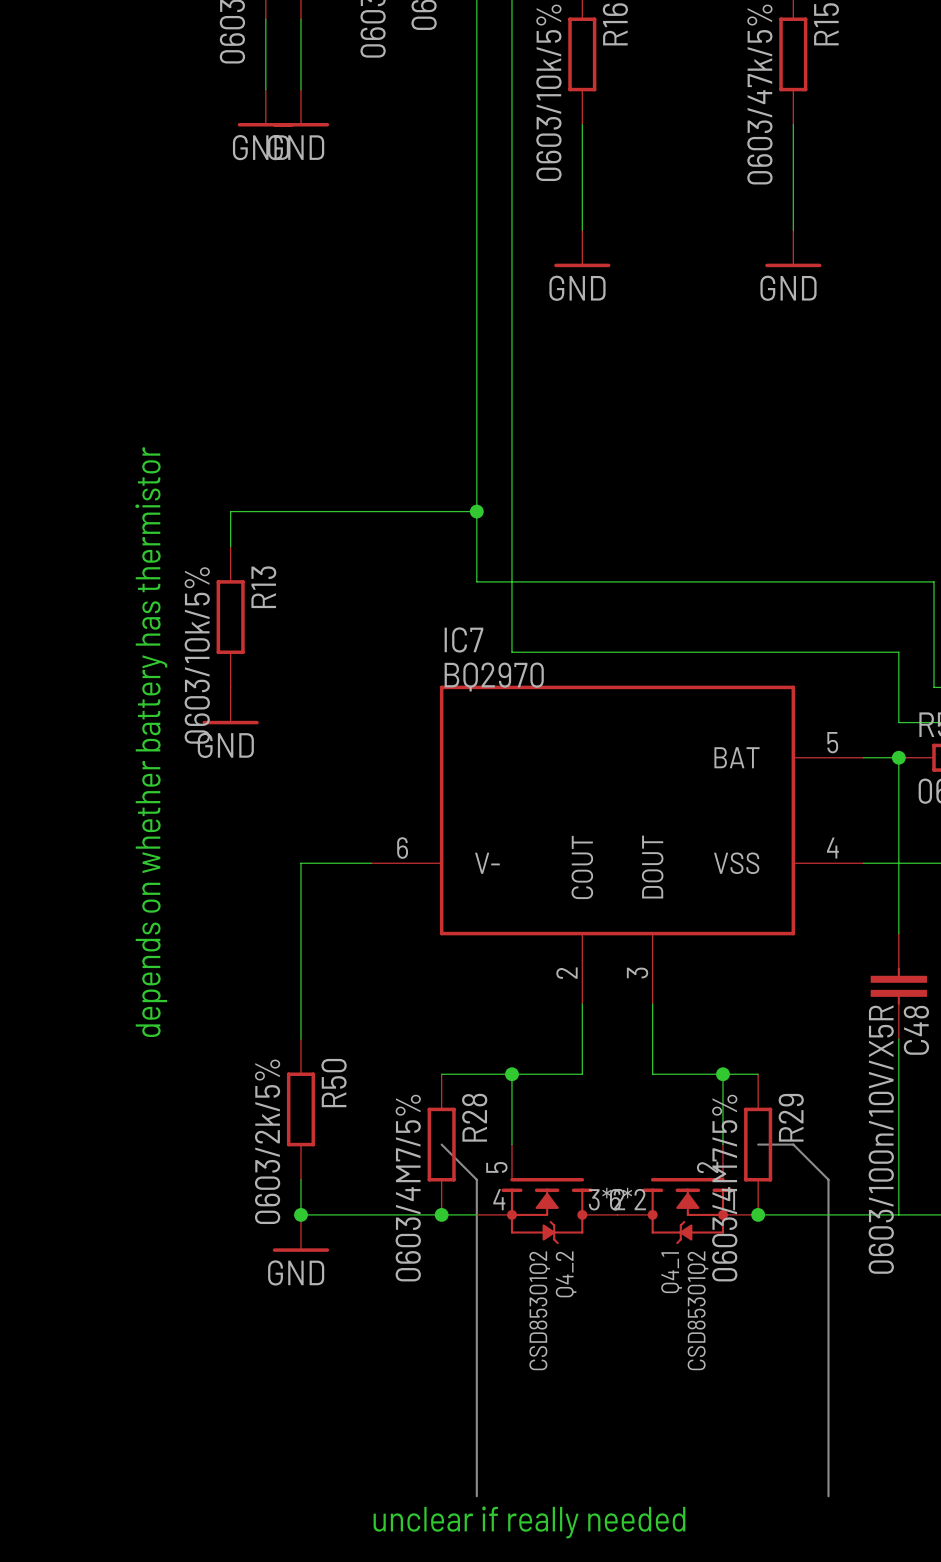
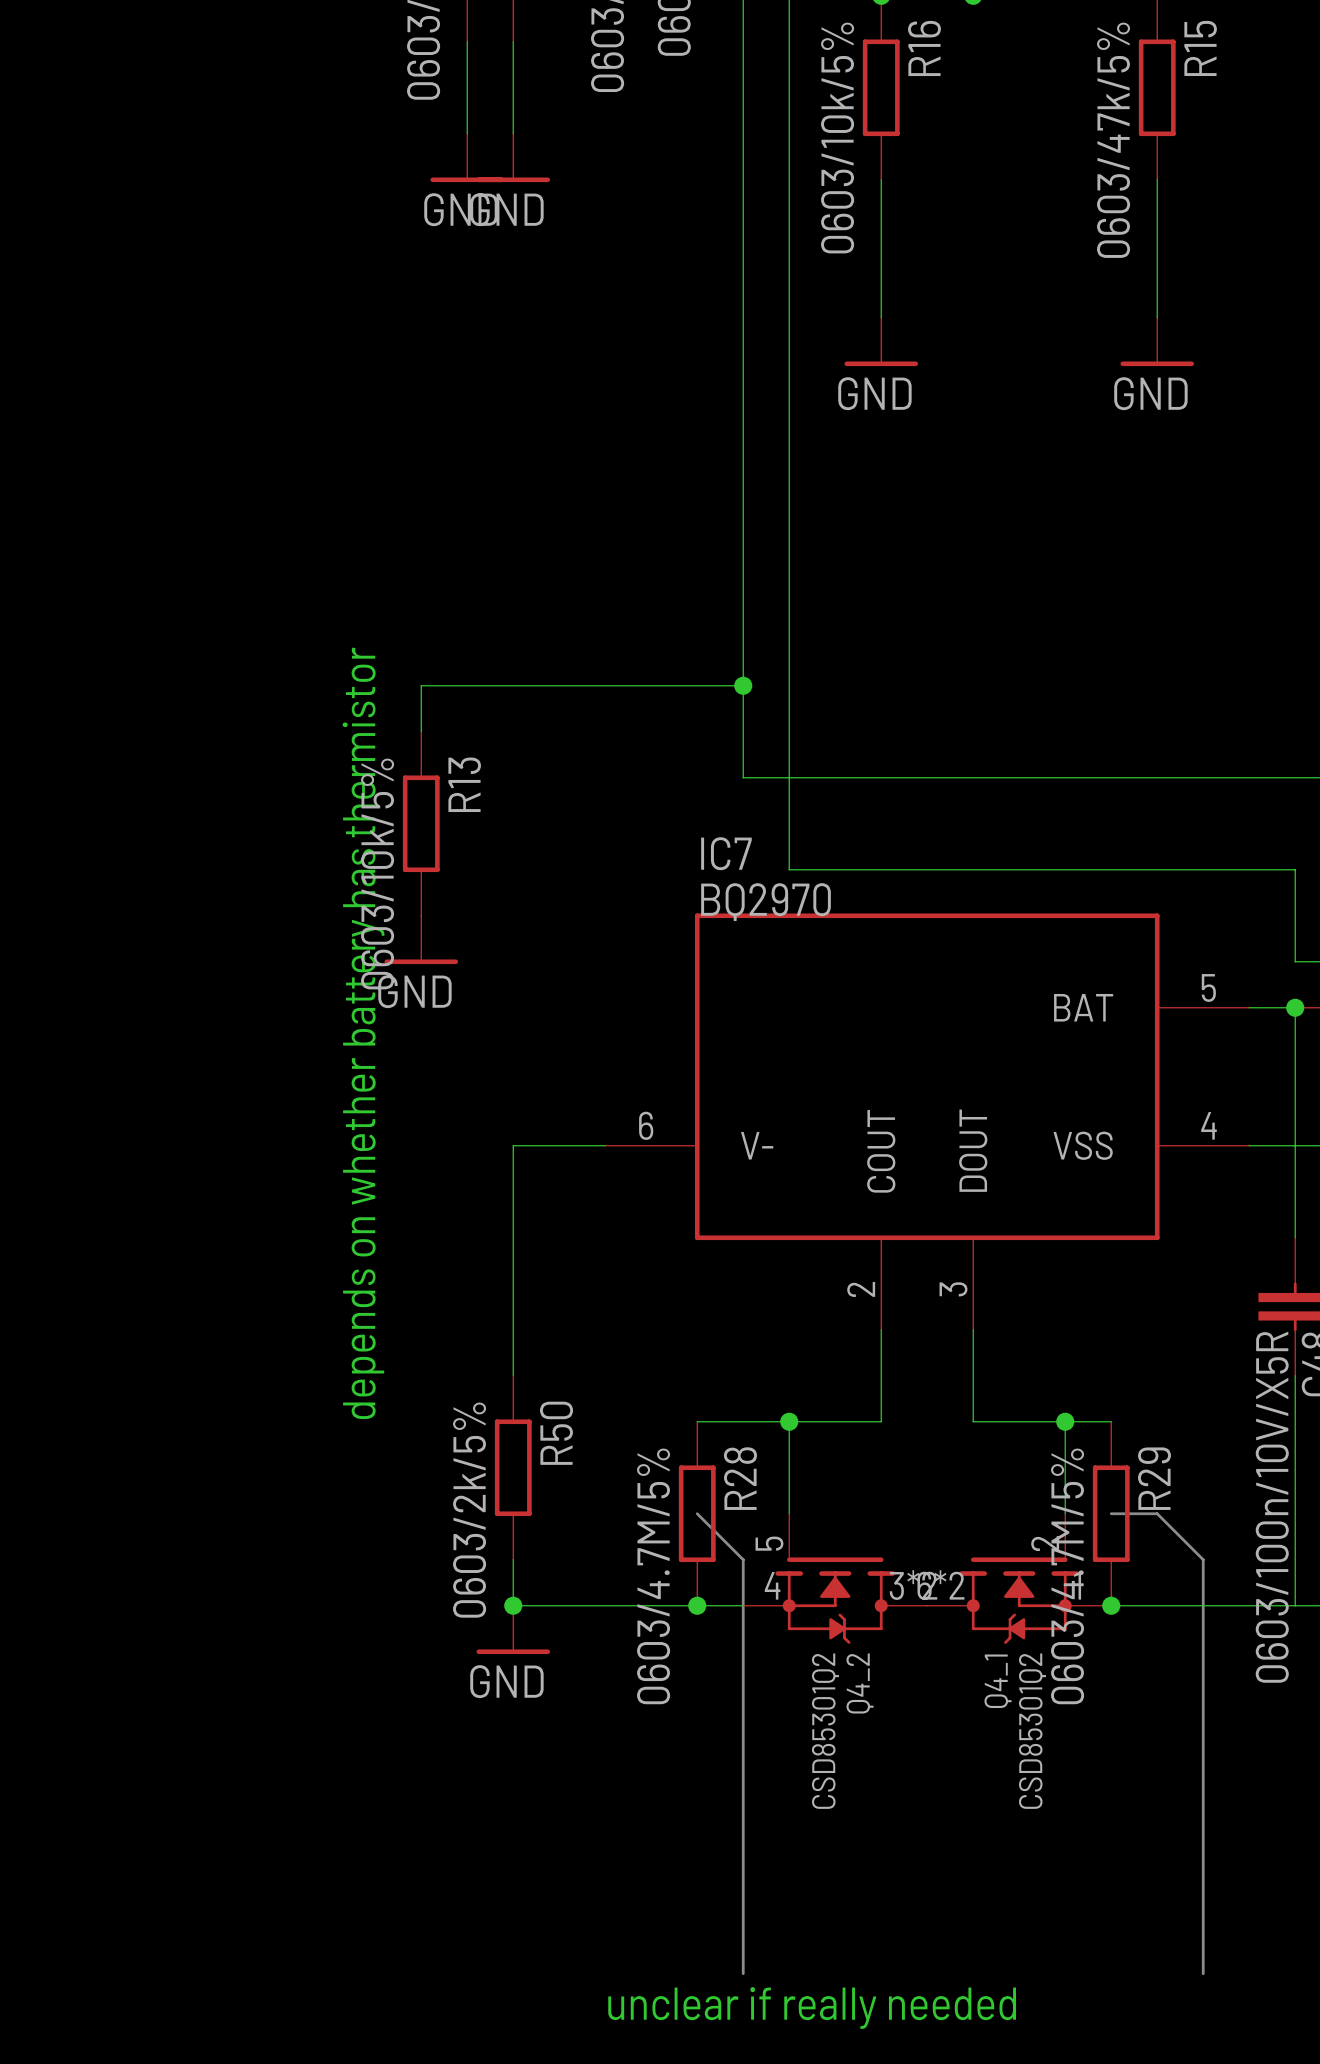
text position: depends on whether battery has thermistor (151, 742) -> depends on whether battery has thermistor (363, 1033)
R28 value: 0603/4M7/5% (408, 1188) -> 0603/4.7M/5% (653, 1576)
R29 value: 0603/4M7/5% (724, 1188) -> 0603/4.7M/5% (1067, 1576)

